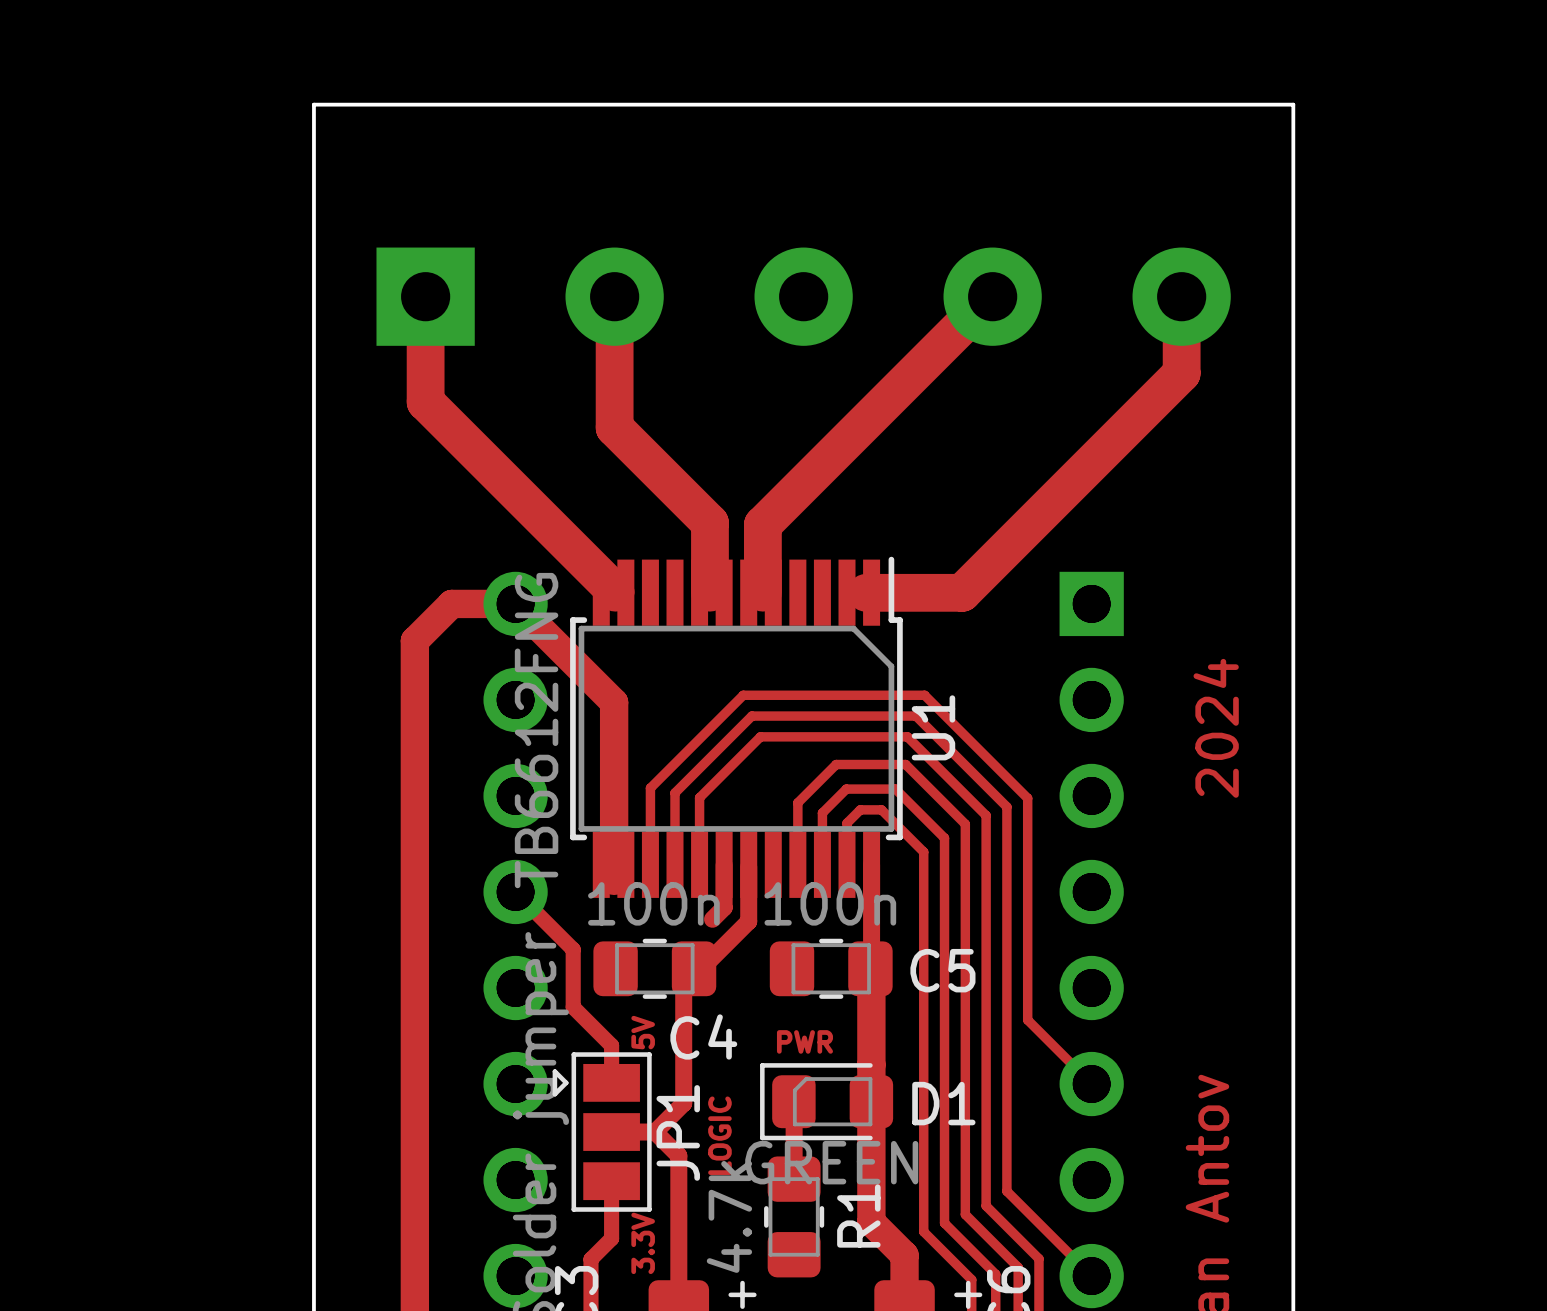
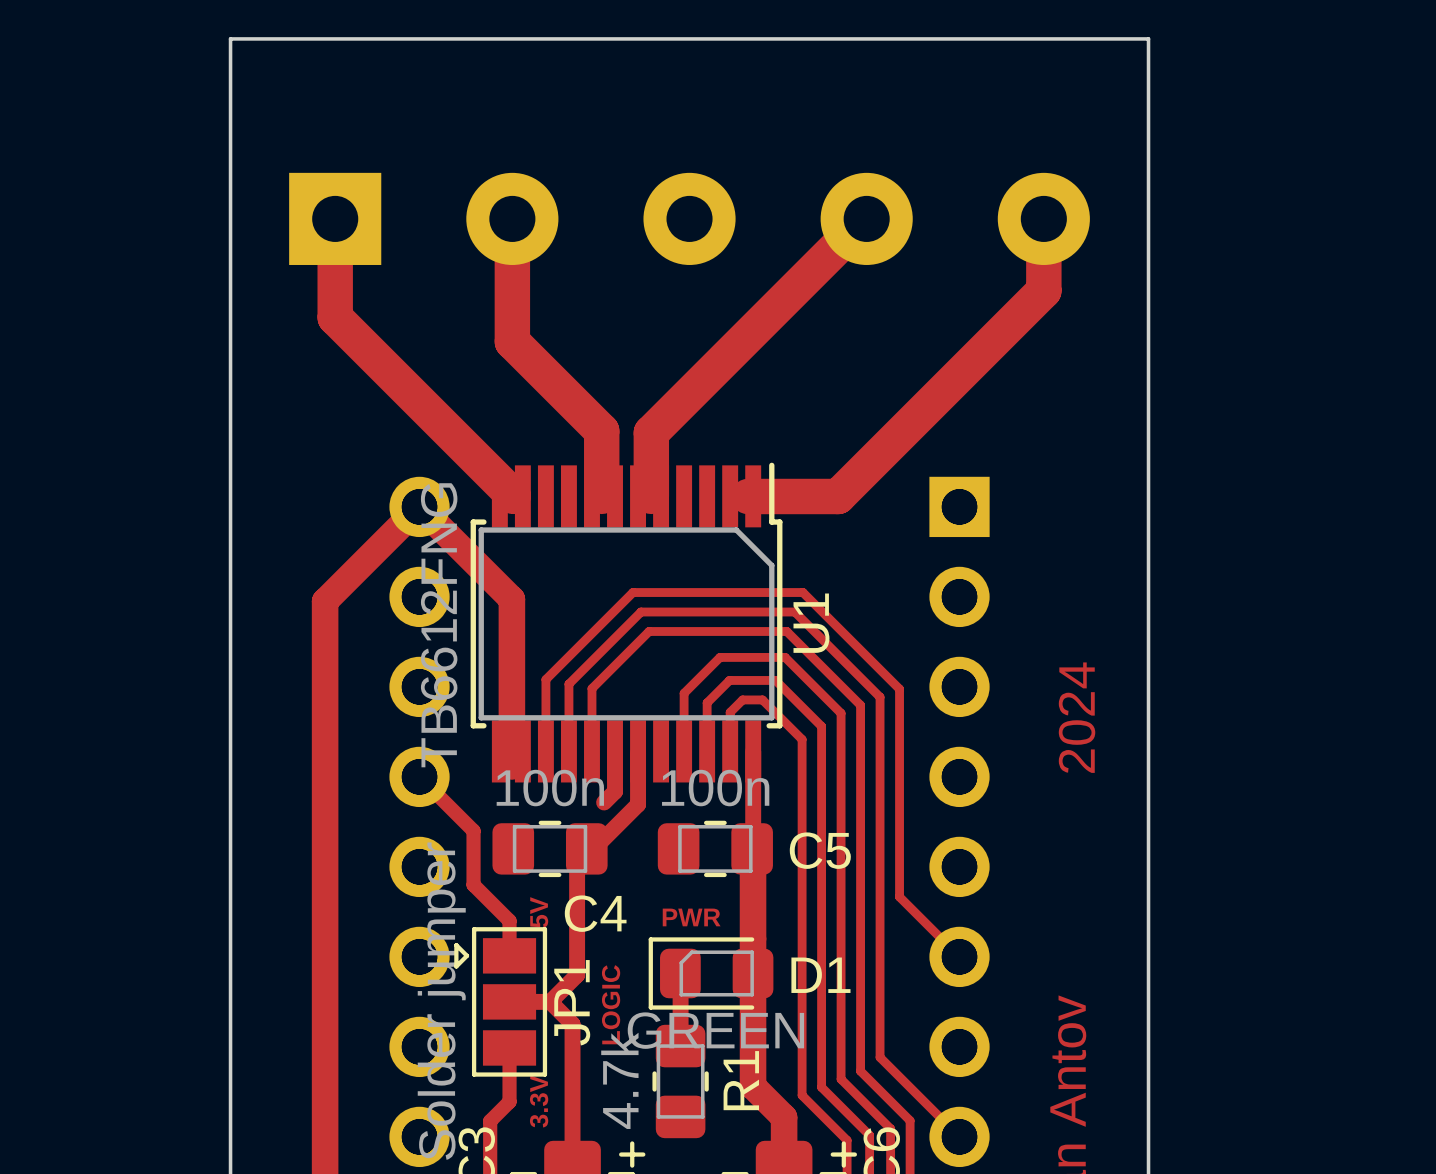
track: (515, 603) (451, 603) (414, 640) (414, 704) -> (419, 506) (325, 601)
text position: 2024 (1216, 728) -> 2024 (1077, 717)

